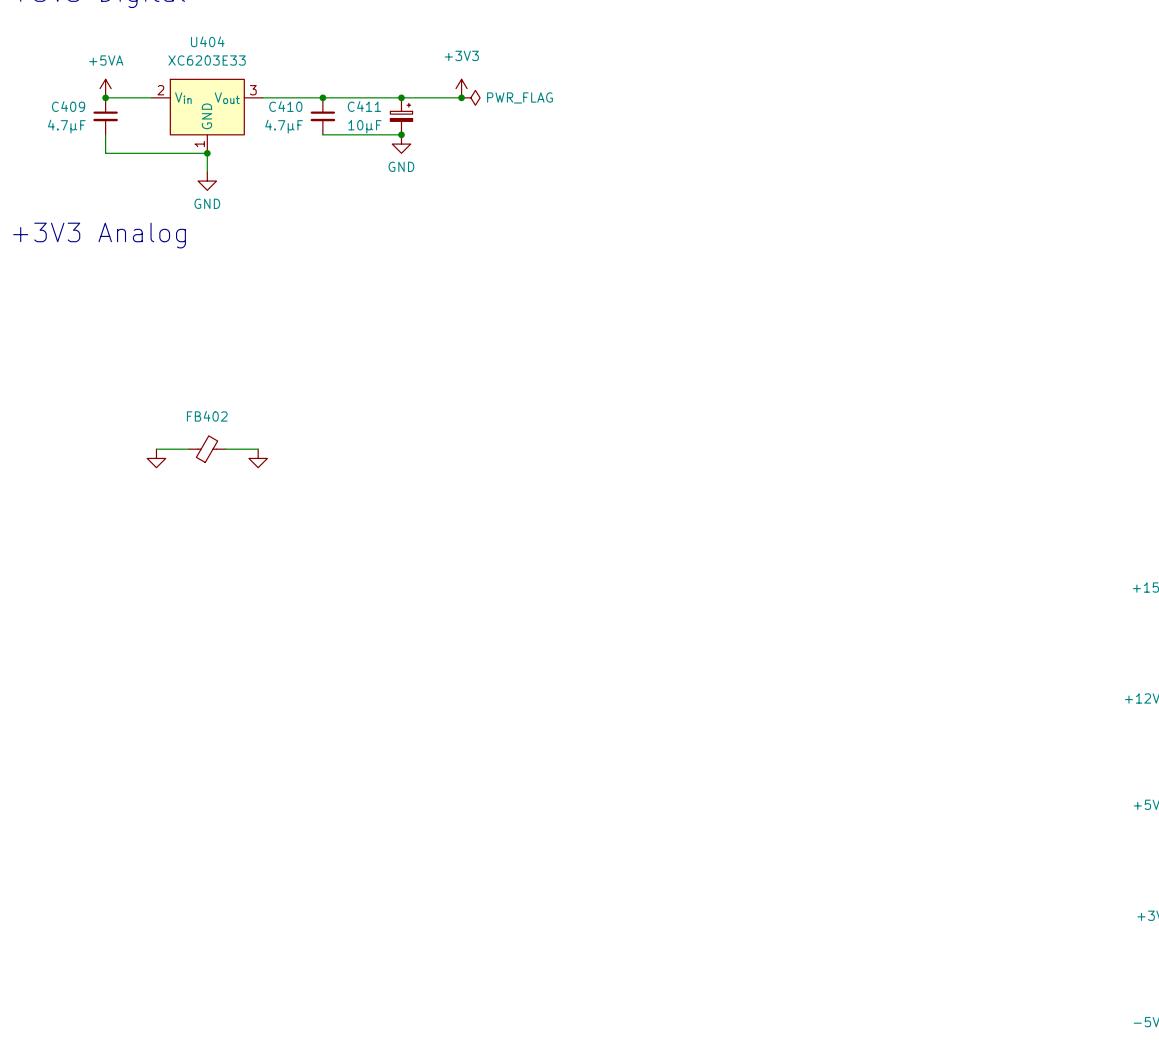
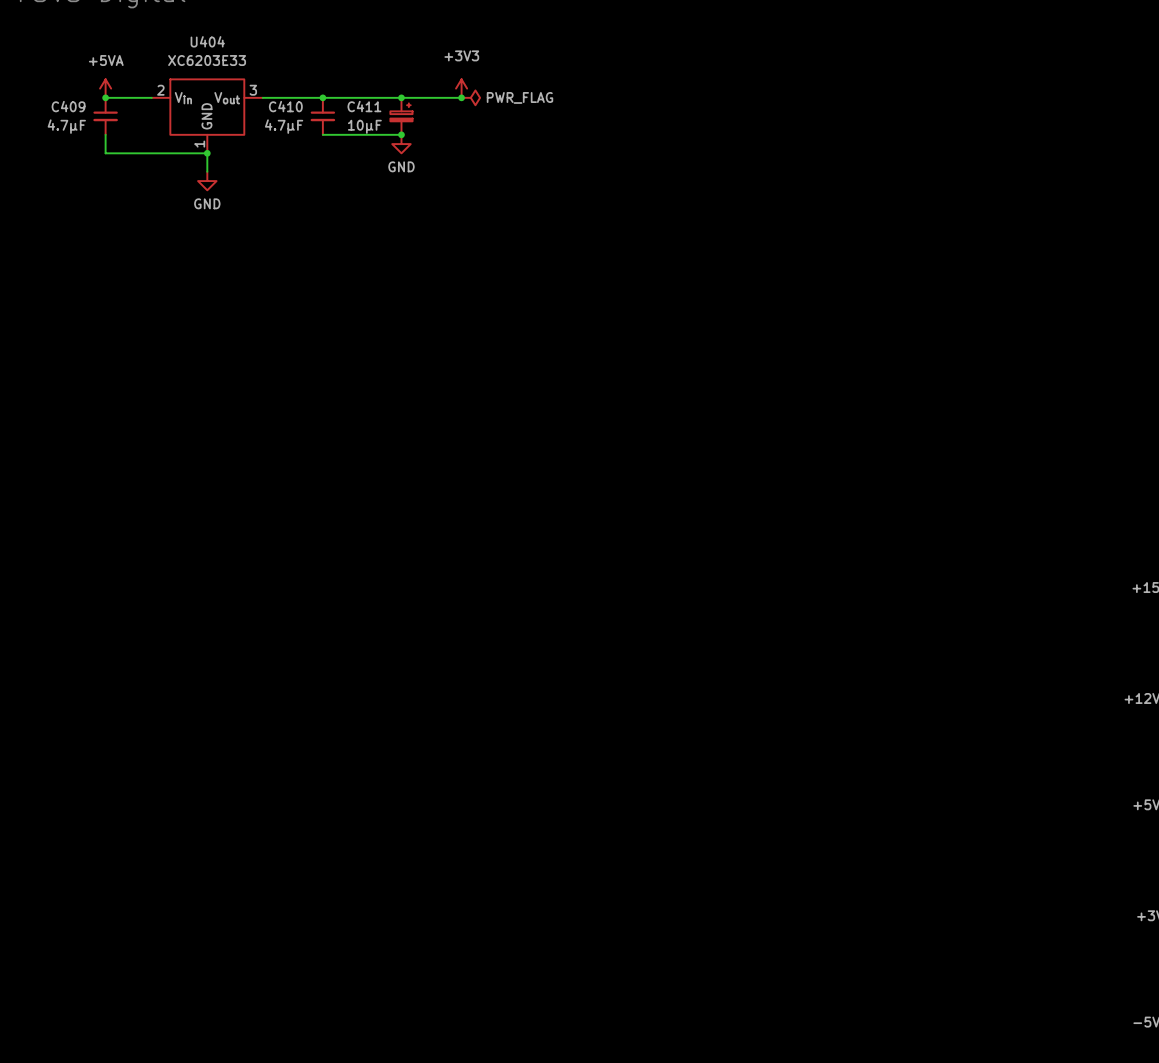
text: +3V3 Analog (99, 235) -> none
wire: (156, 449) (188, 449) -> none
FB402: (207, 449) -> none
wire: (225, 449) (258, 449) -> none
power symbol: (156, 458) -> none
power symbol: (258, 458) -> none

